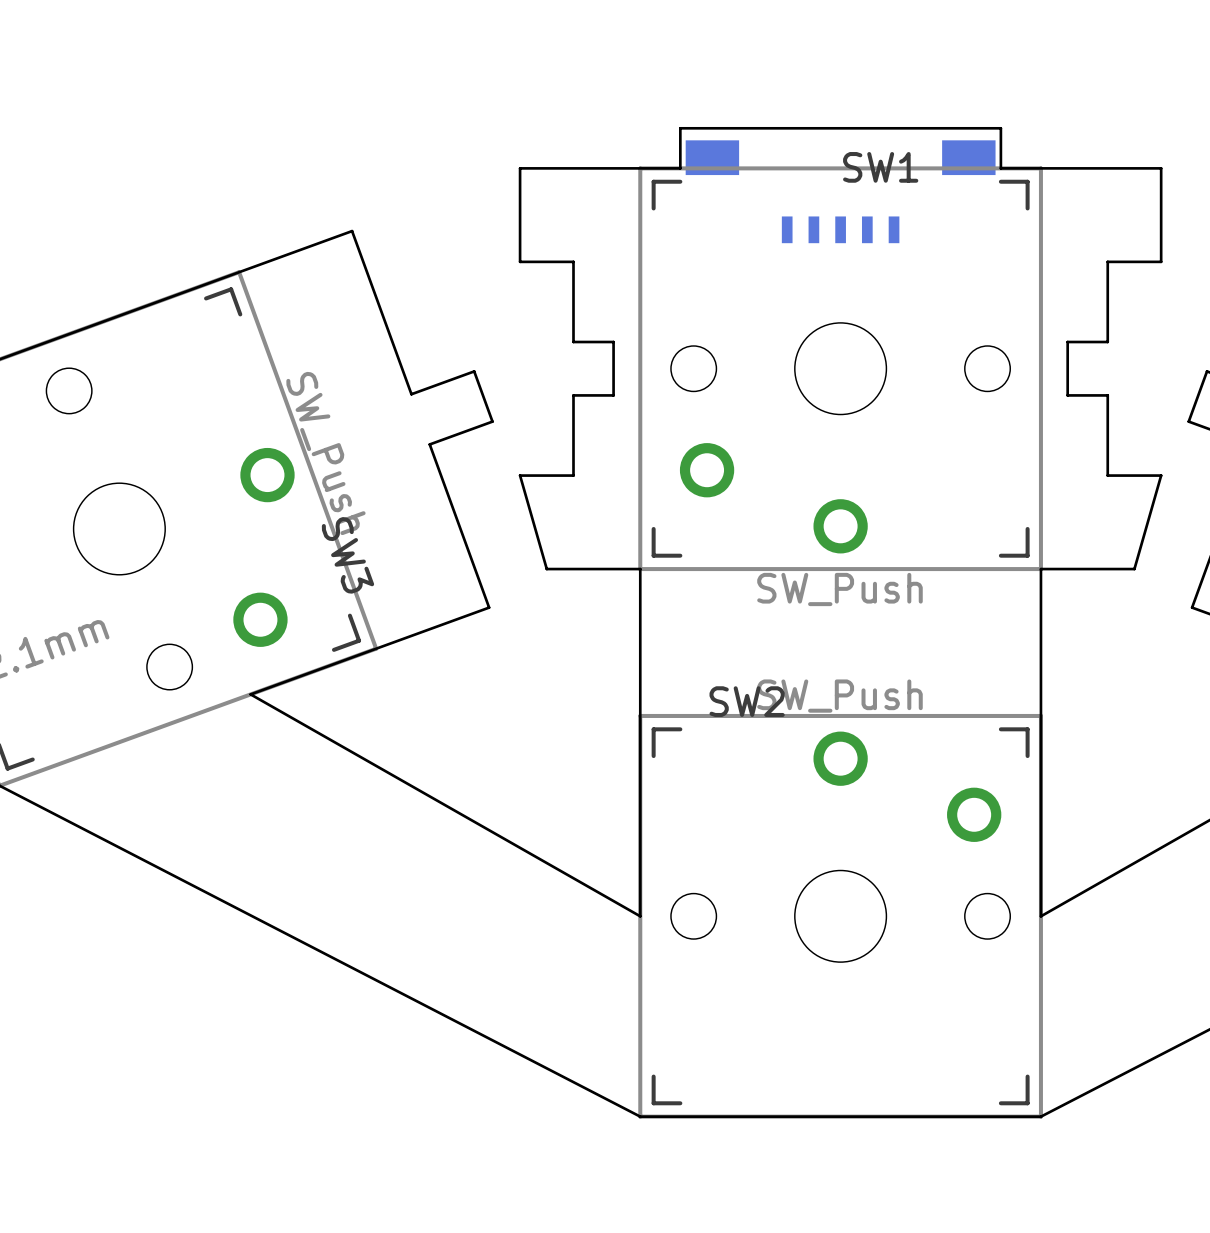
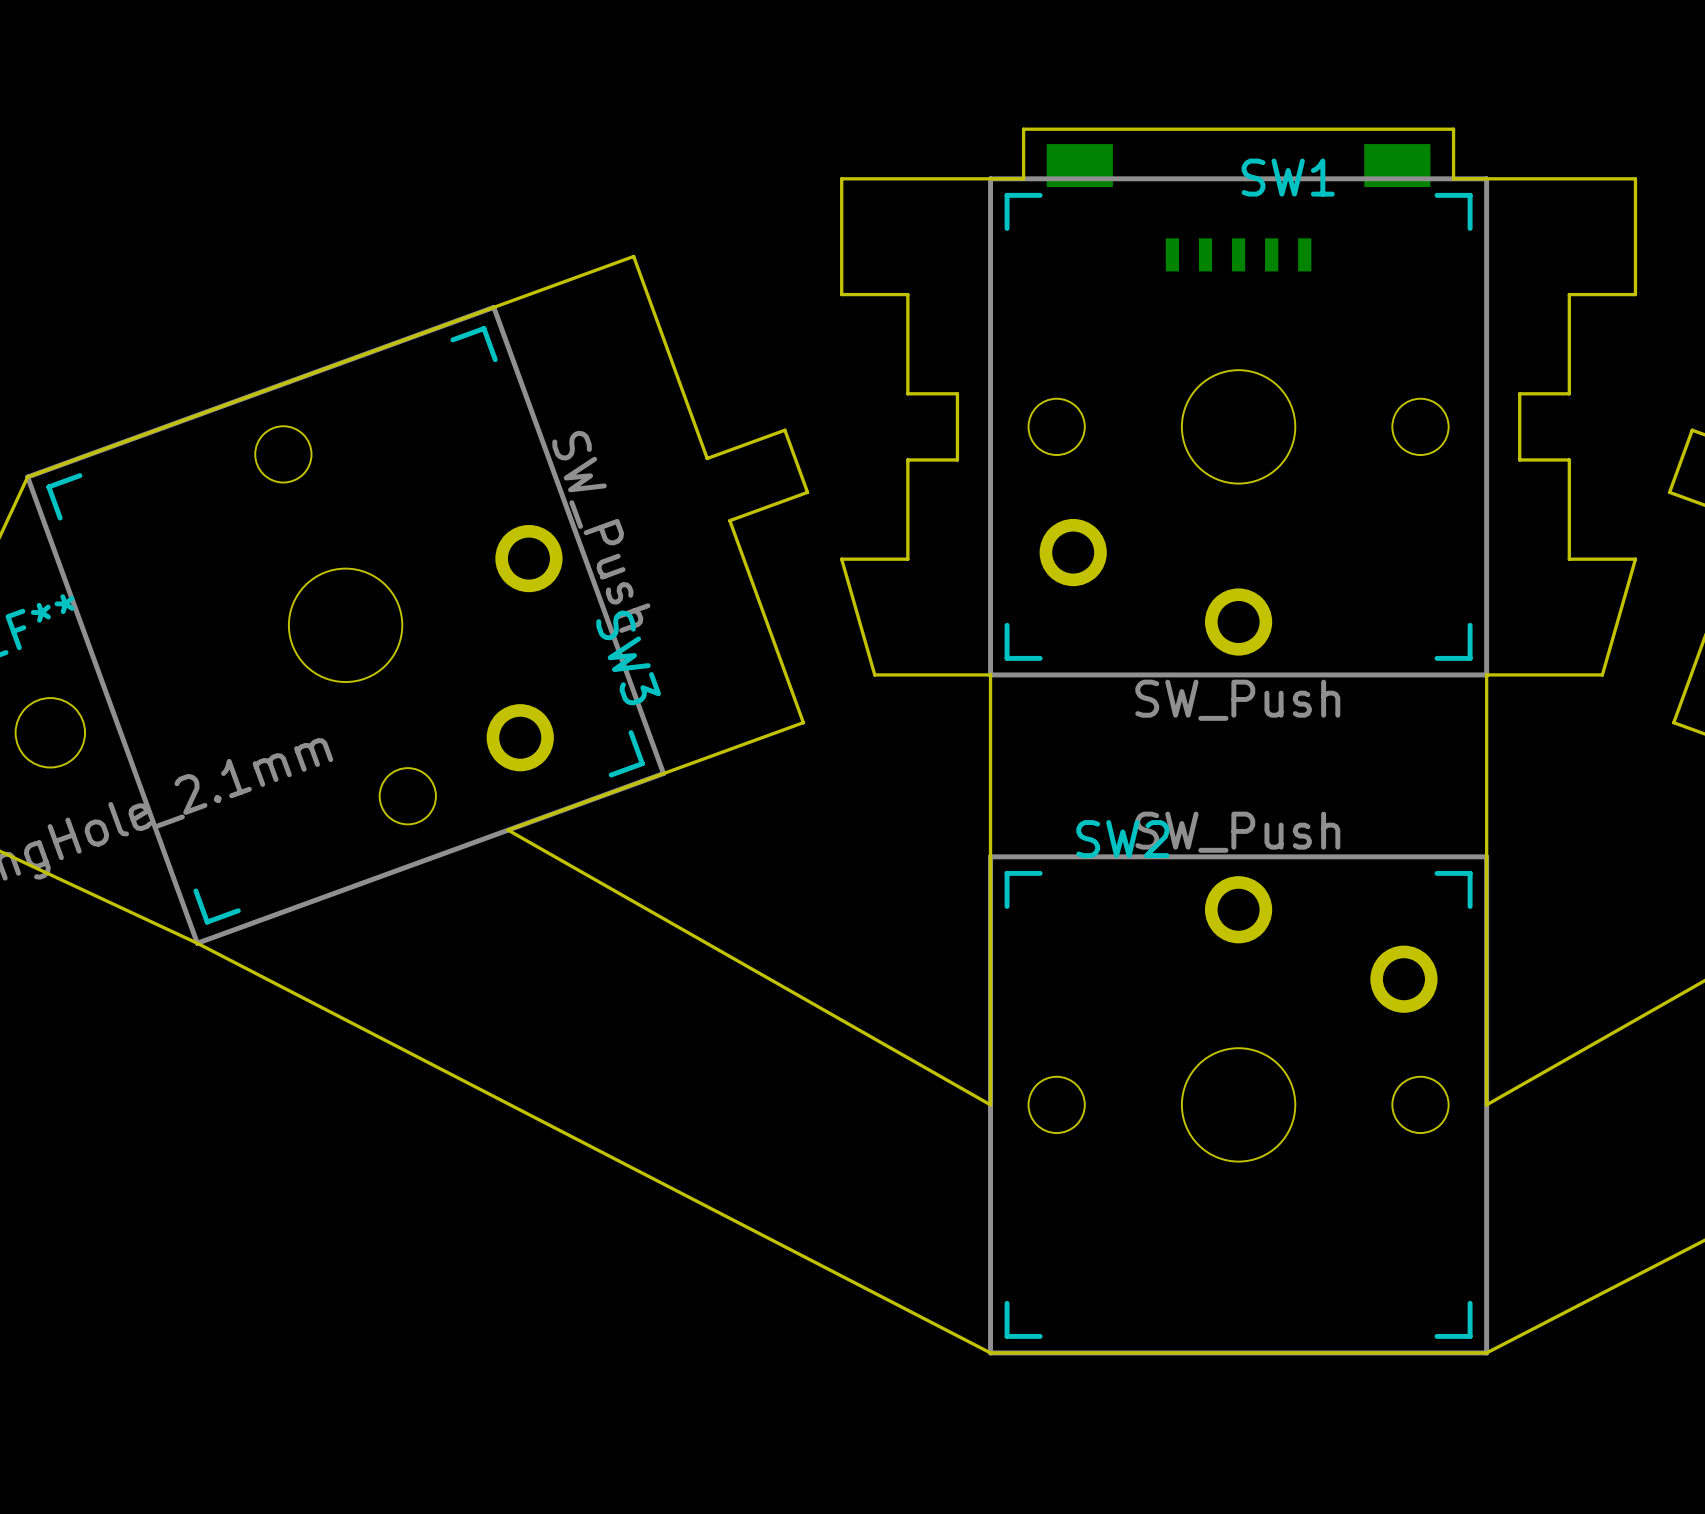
board edge: (680, 128) (680, 168) (666, 168) -> (1040, 129) (1023, 129) (1023, 178)
board edge: (1000, 128) (1000, 168) (1014, 168) -> (1437, 129) (1453, 129) (1453, 178)

